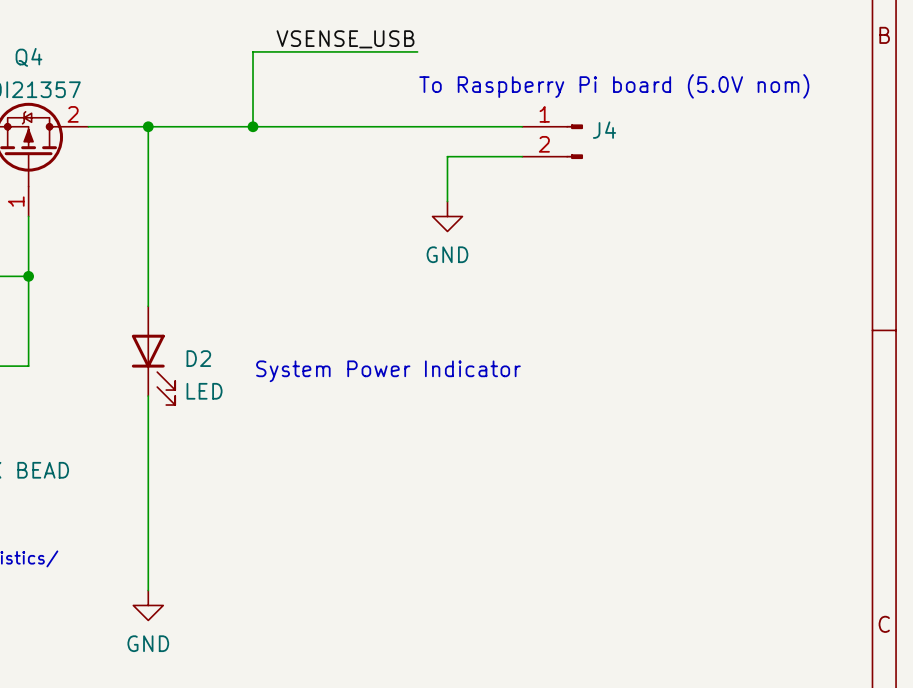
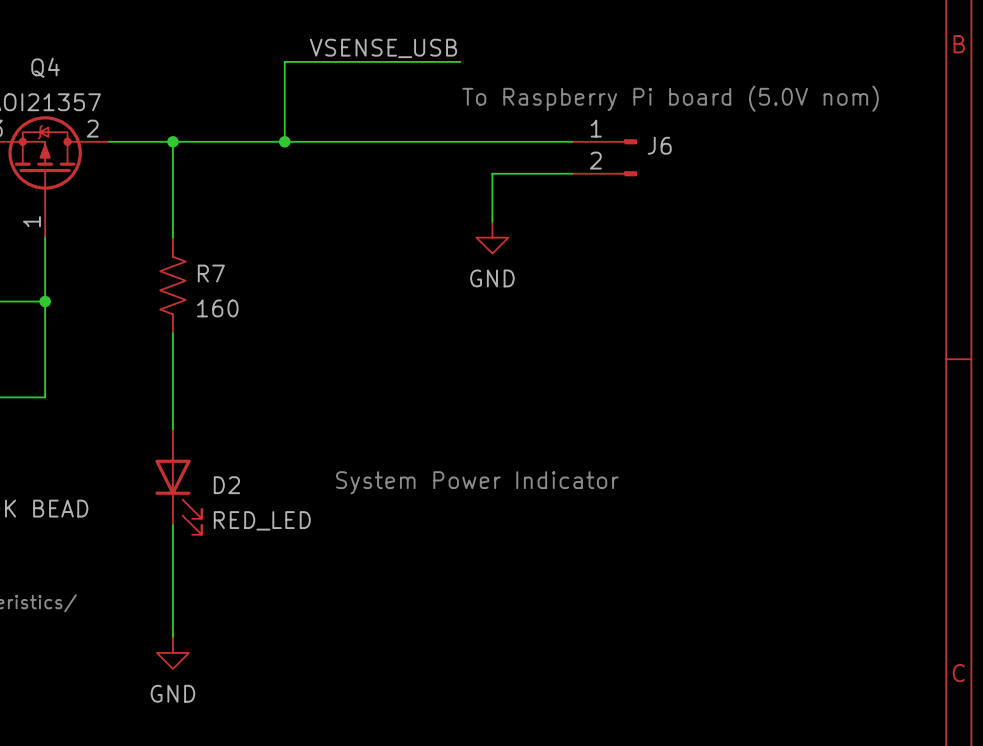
J4 name: J4 (604, 130) -> J6 (659, 145)
R7: none -> 160 (172, 285)
D2 position: (153, 355) -> (178, 482)
text position: System Power Indicator (388, 371) -> System Power Indicator (477, 482)
D2 value: LED (204, 391) -> RED_LED (262, 520)

